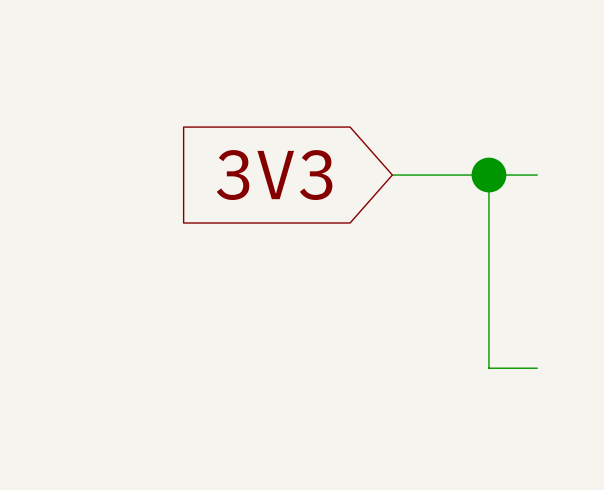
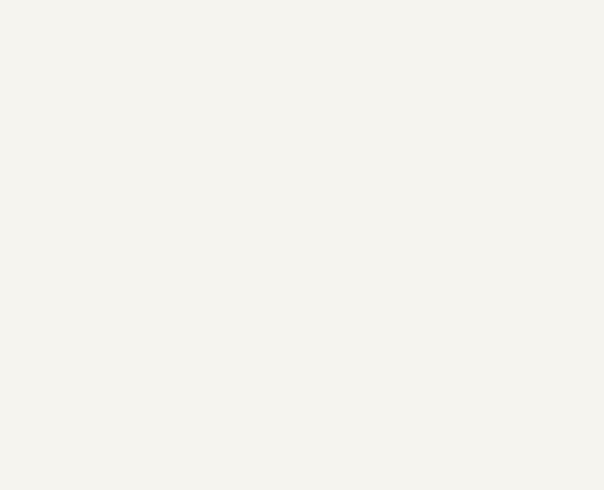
global label: 3V3 (274, 175) -> none
wire: (392, 175) (537, 175) -> none
wire: (488, 175) (488, 368) (537, 368) -> none
junction: (488, 175) -> none

